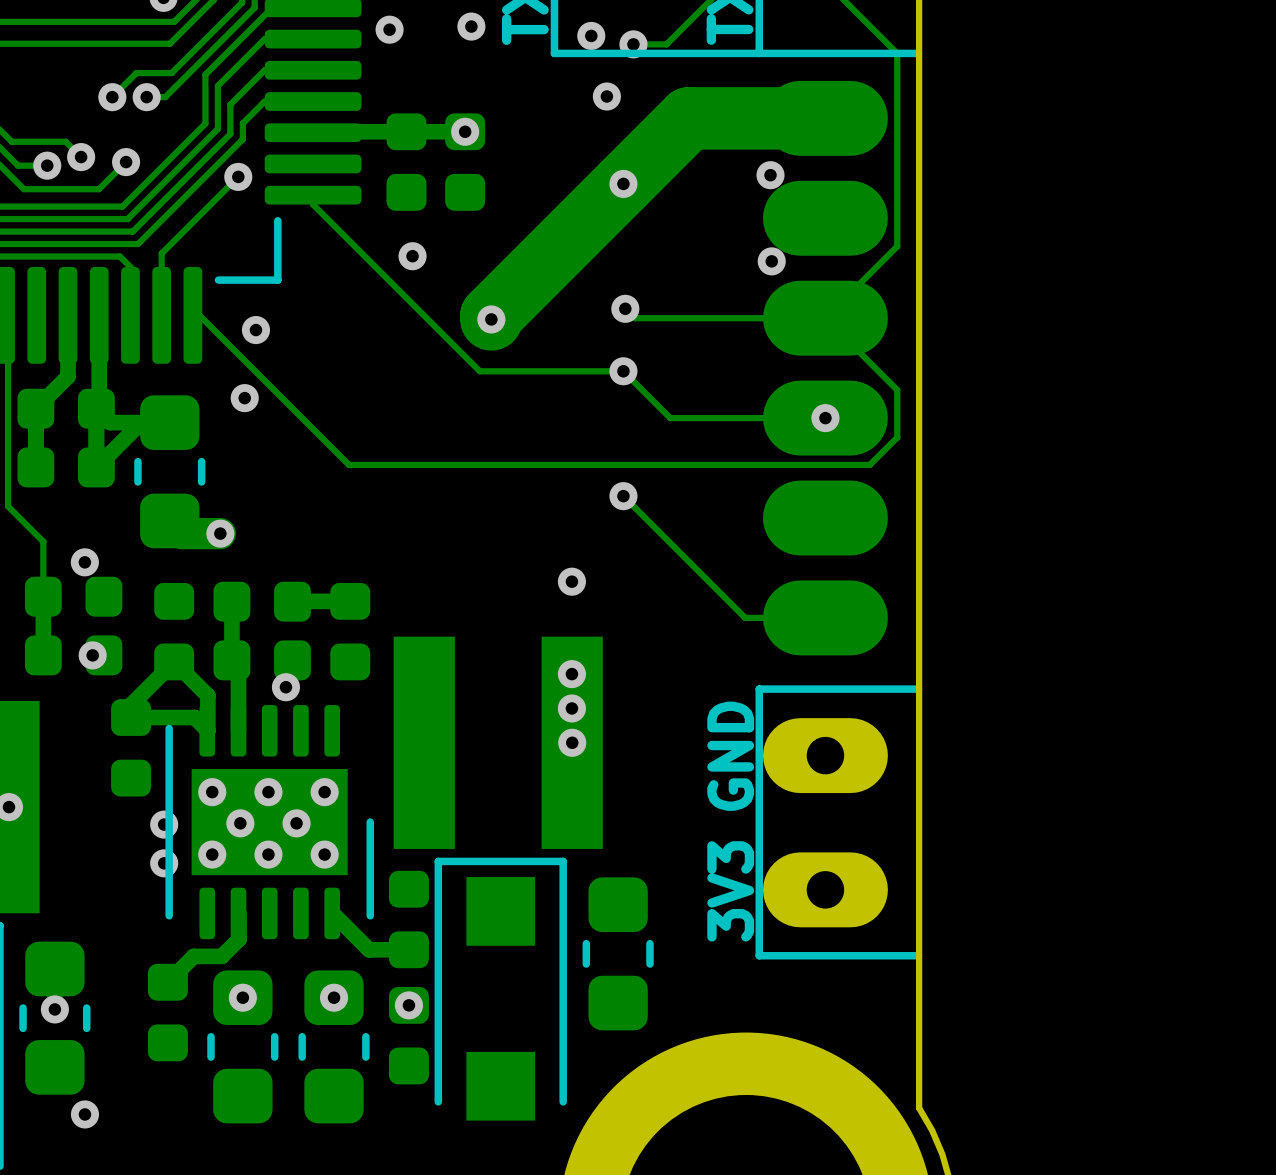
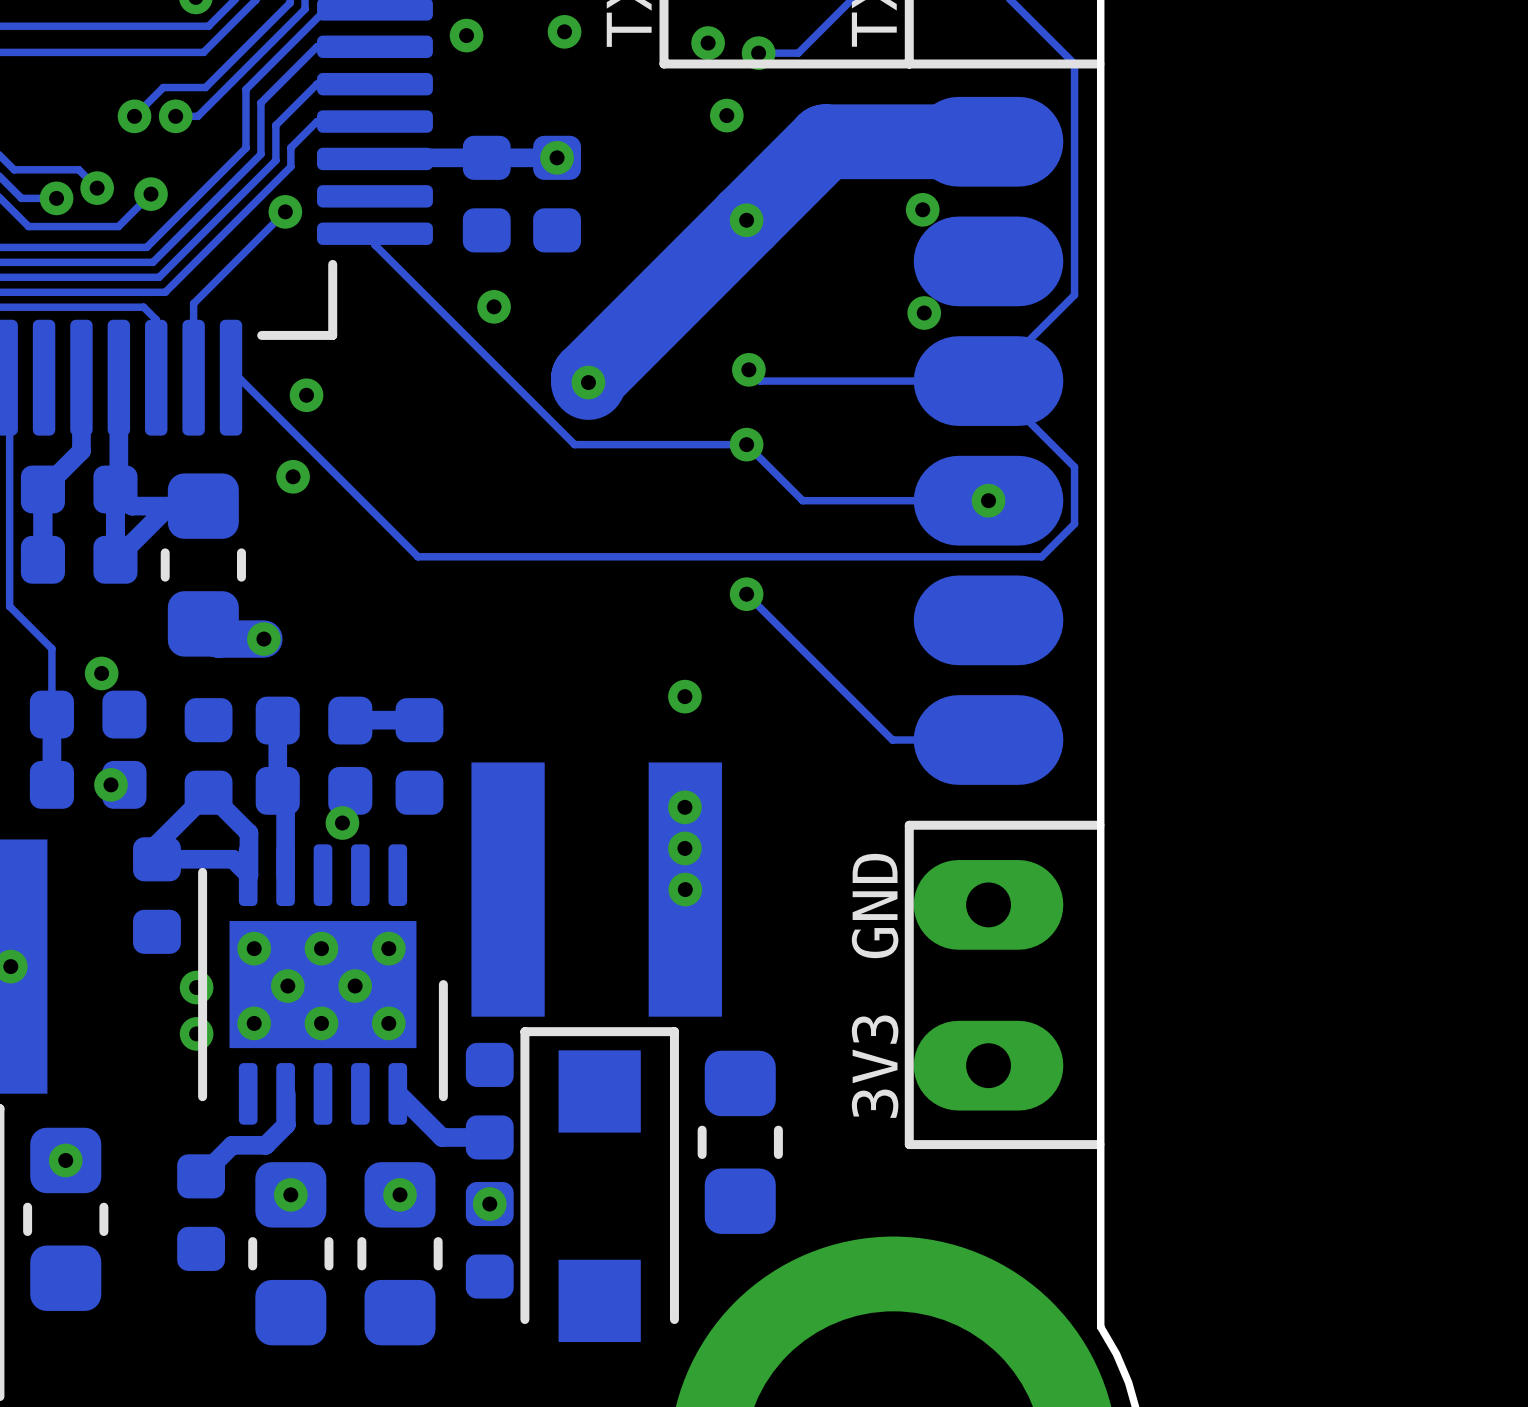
via position: (54, 1009) -> (65, 1160)
via: (84, 1114) -> none

